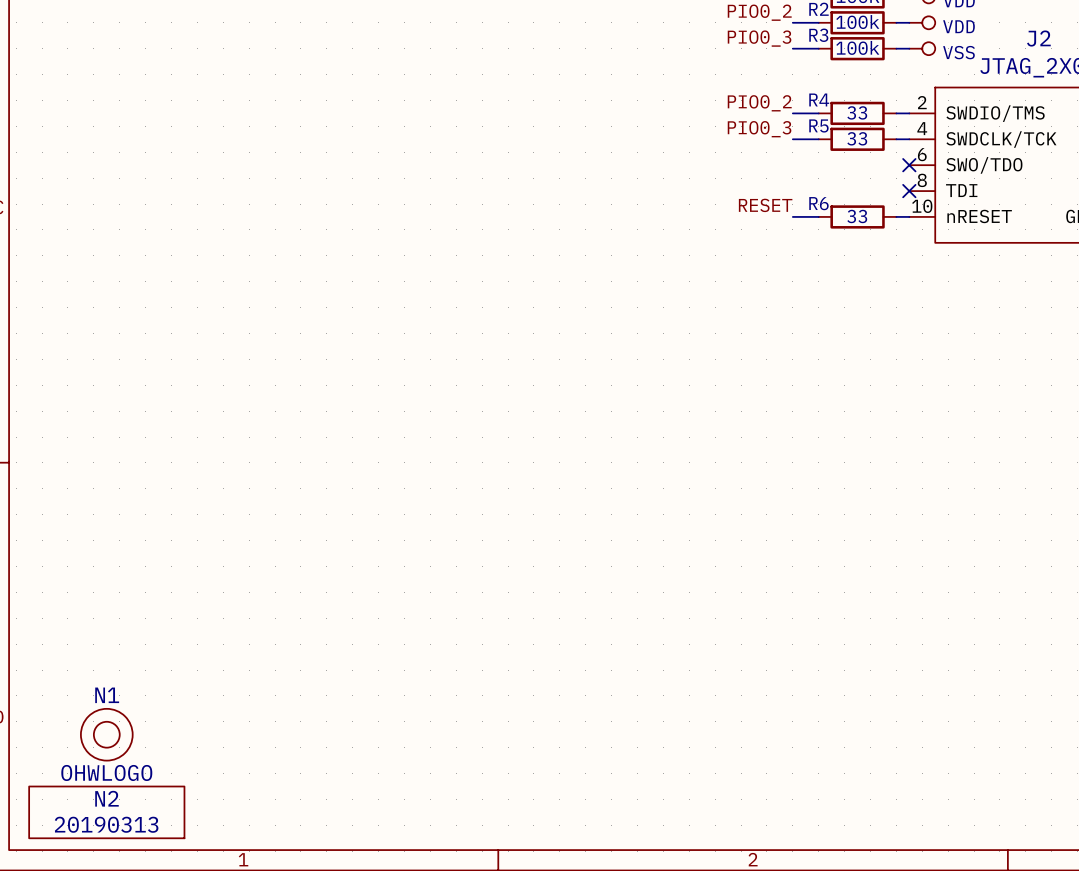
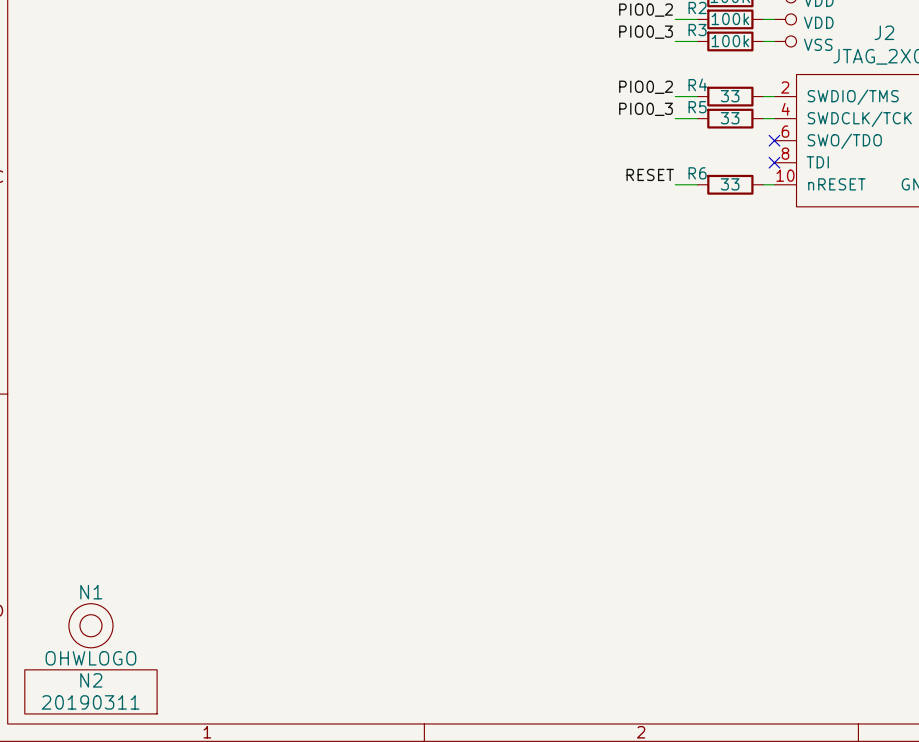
N2 value: 20190313 (106, 824) -> 20190311 (90, 702)

